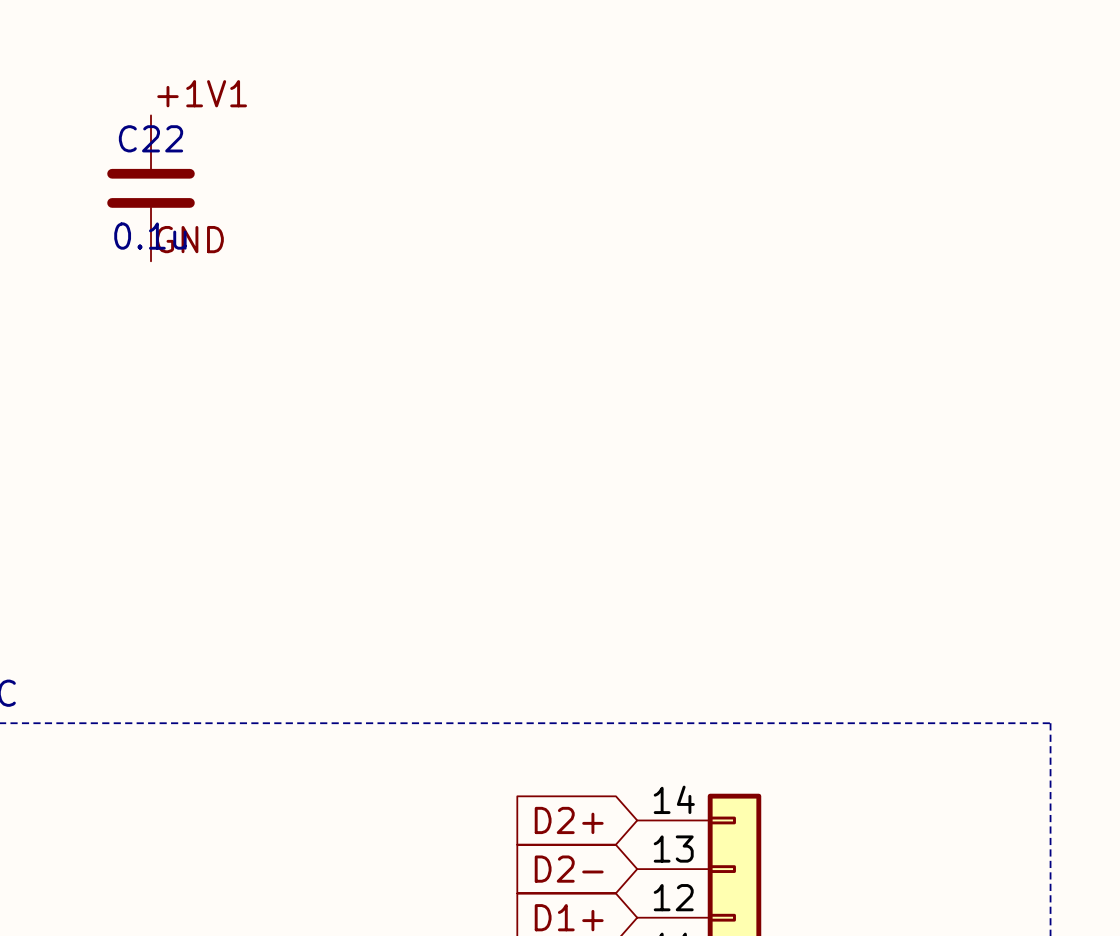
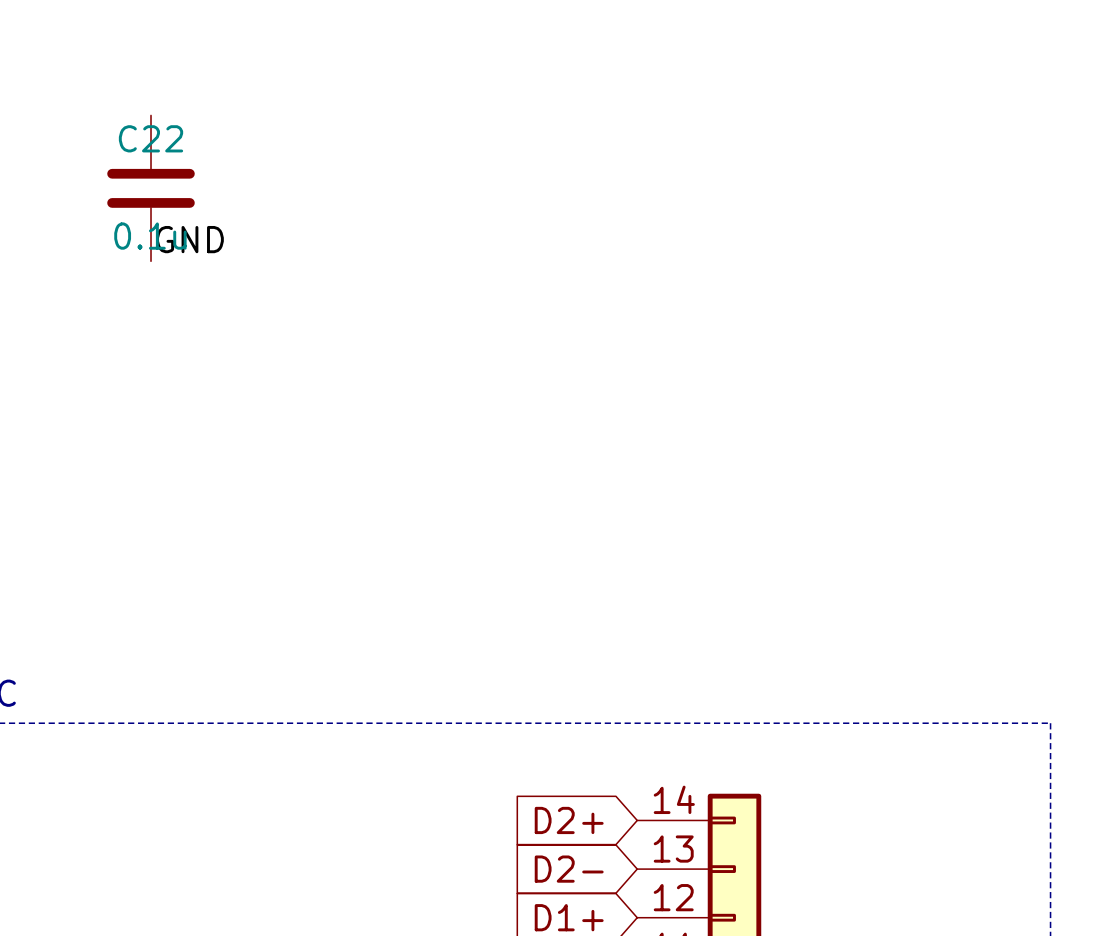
label: +1V1 (202, 93) -> none

